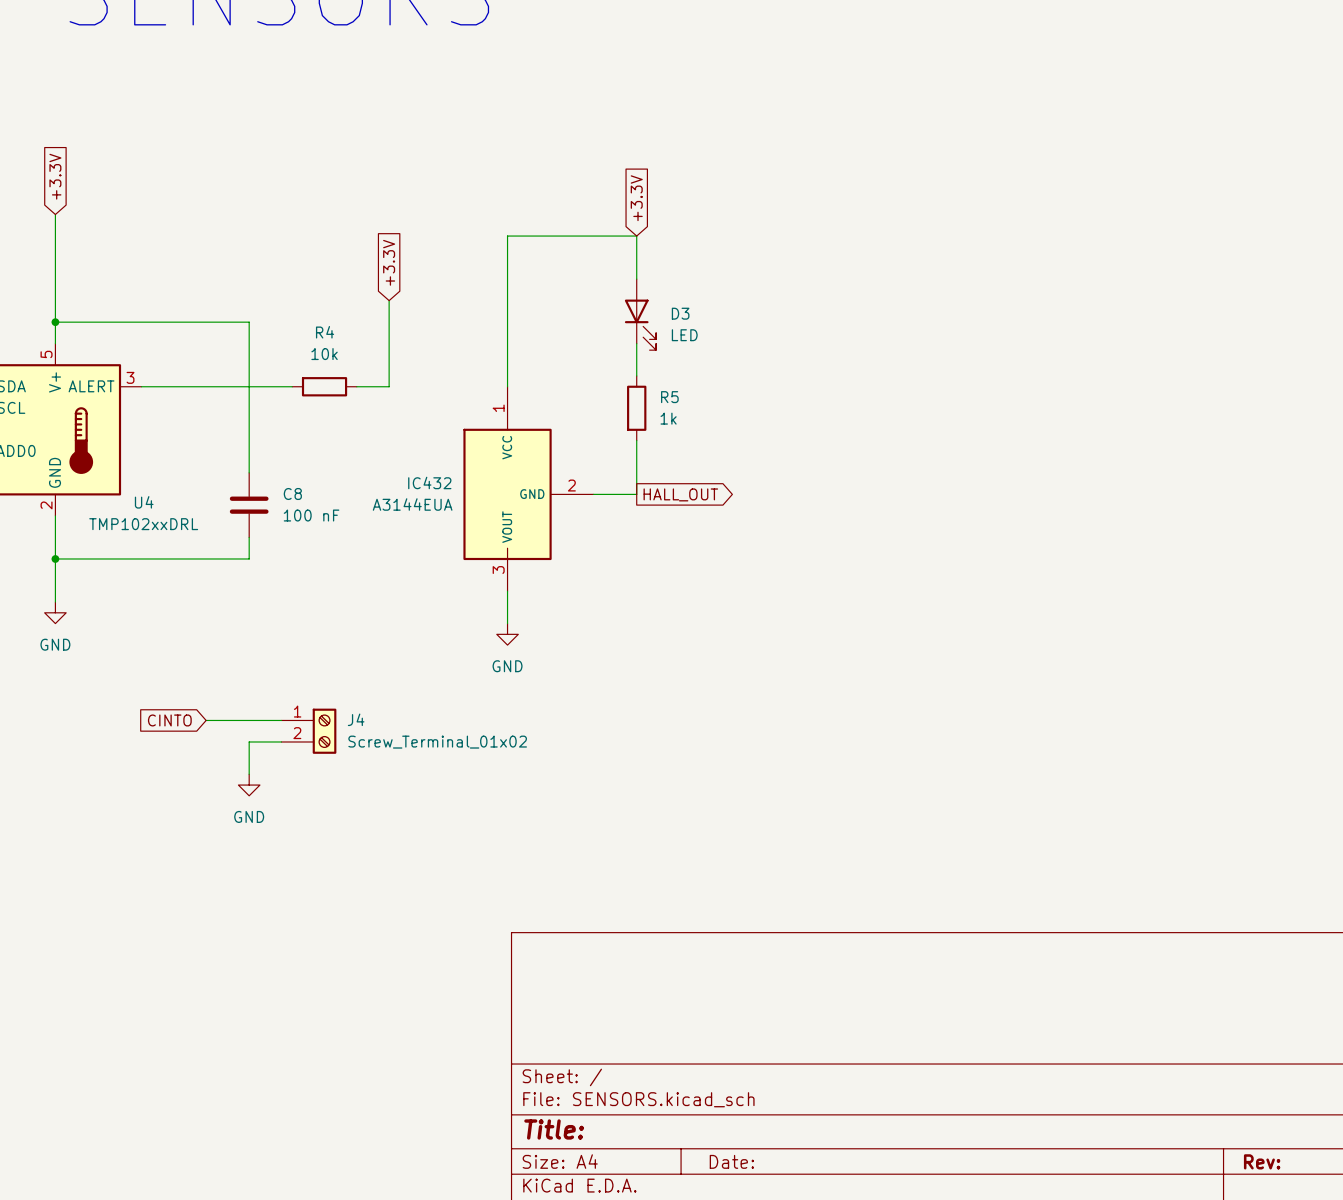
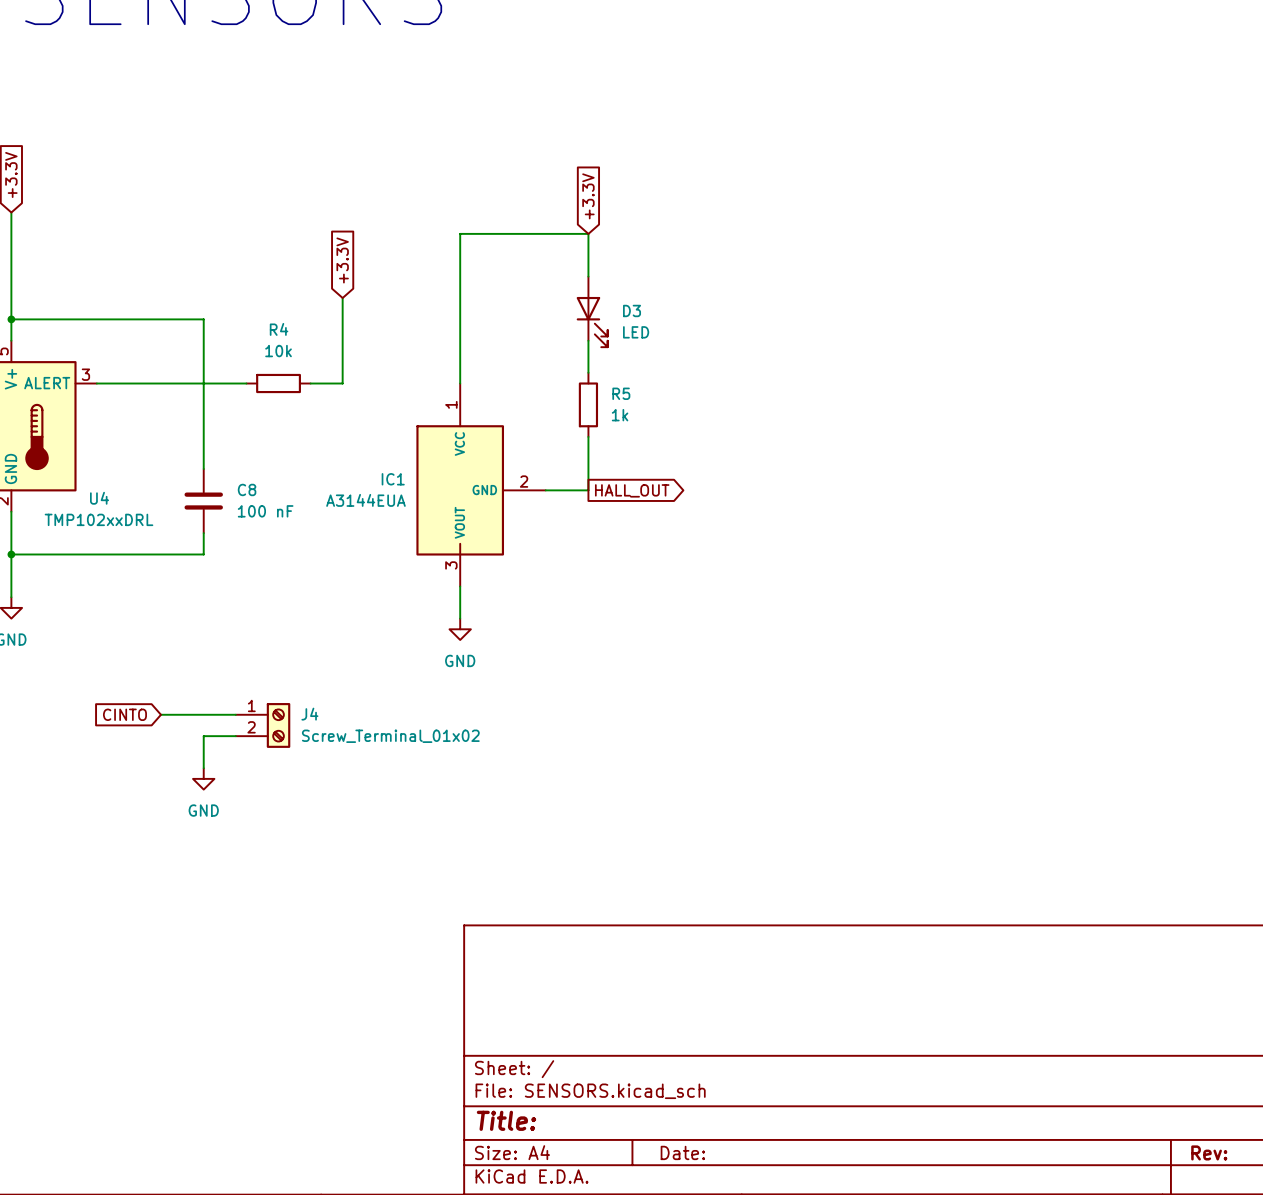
IC432 name: IC432 (429, 482) -> IC1 (393, 479)

